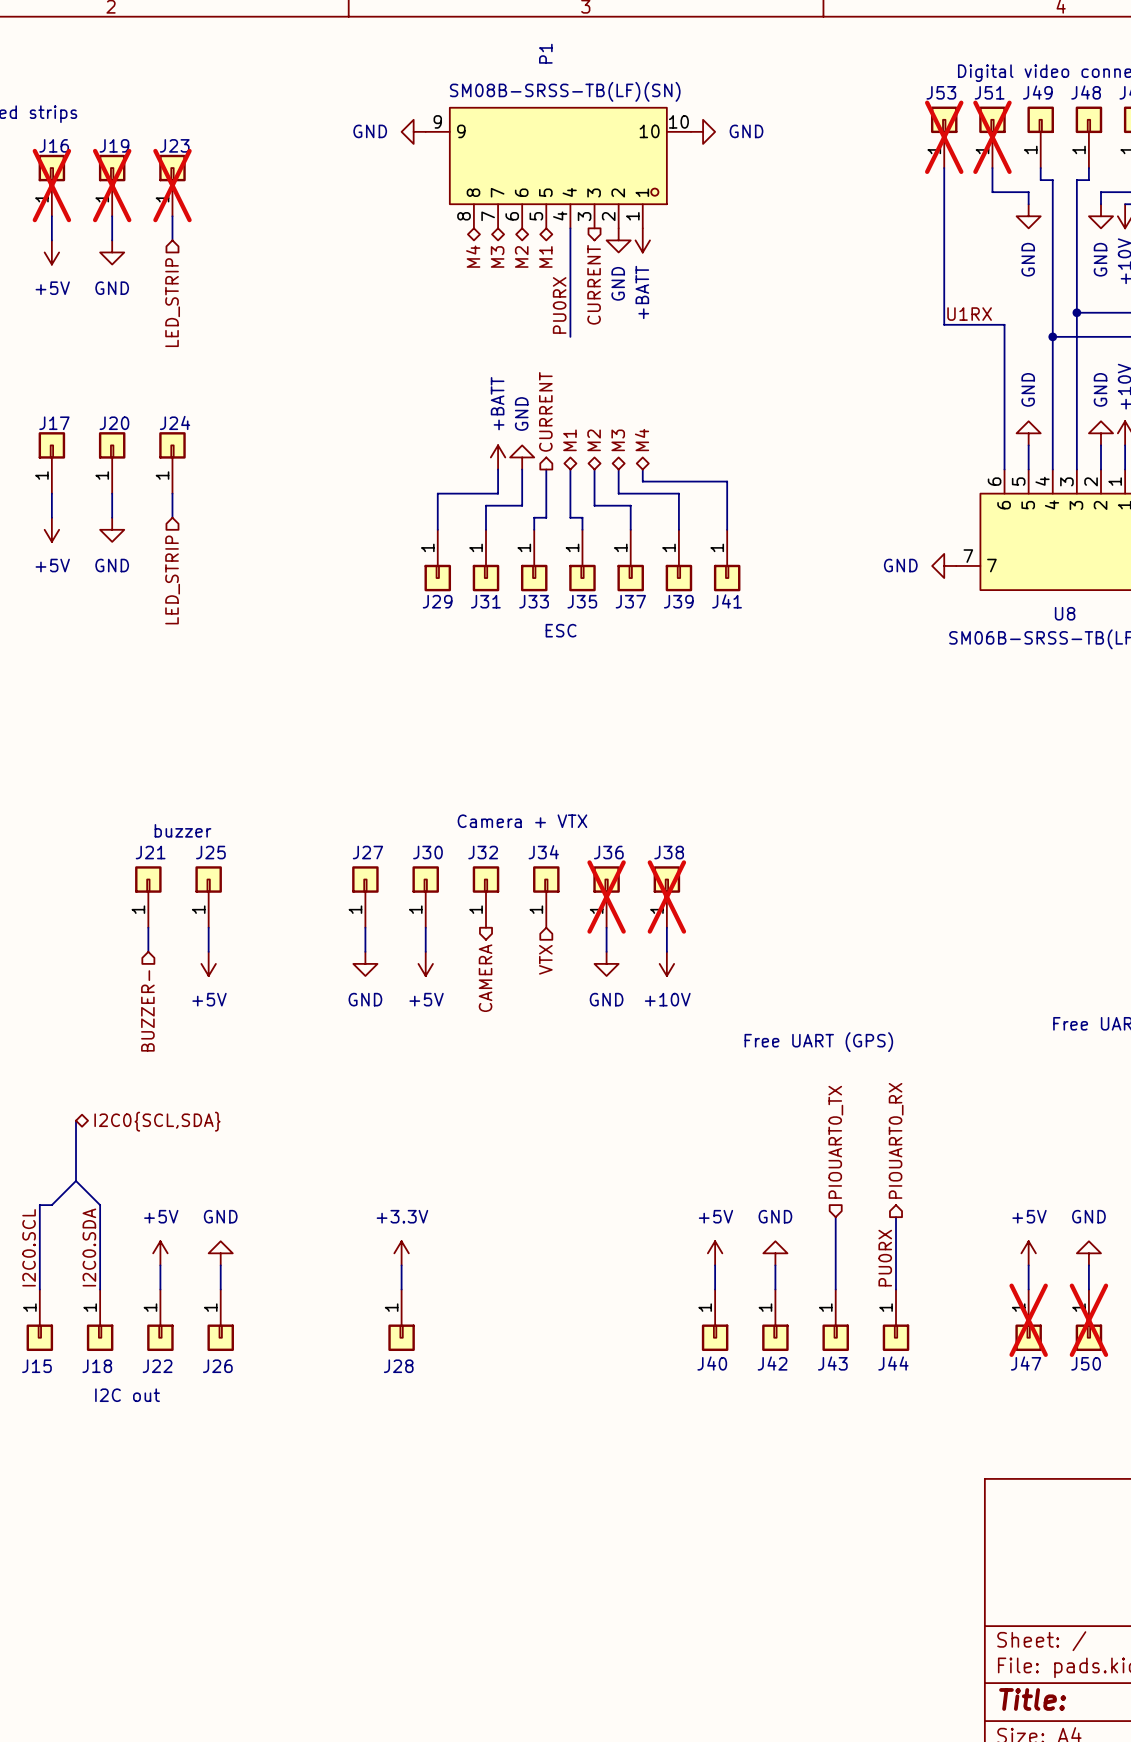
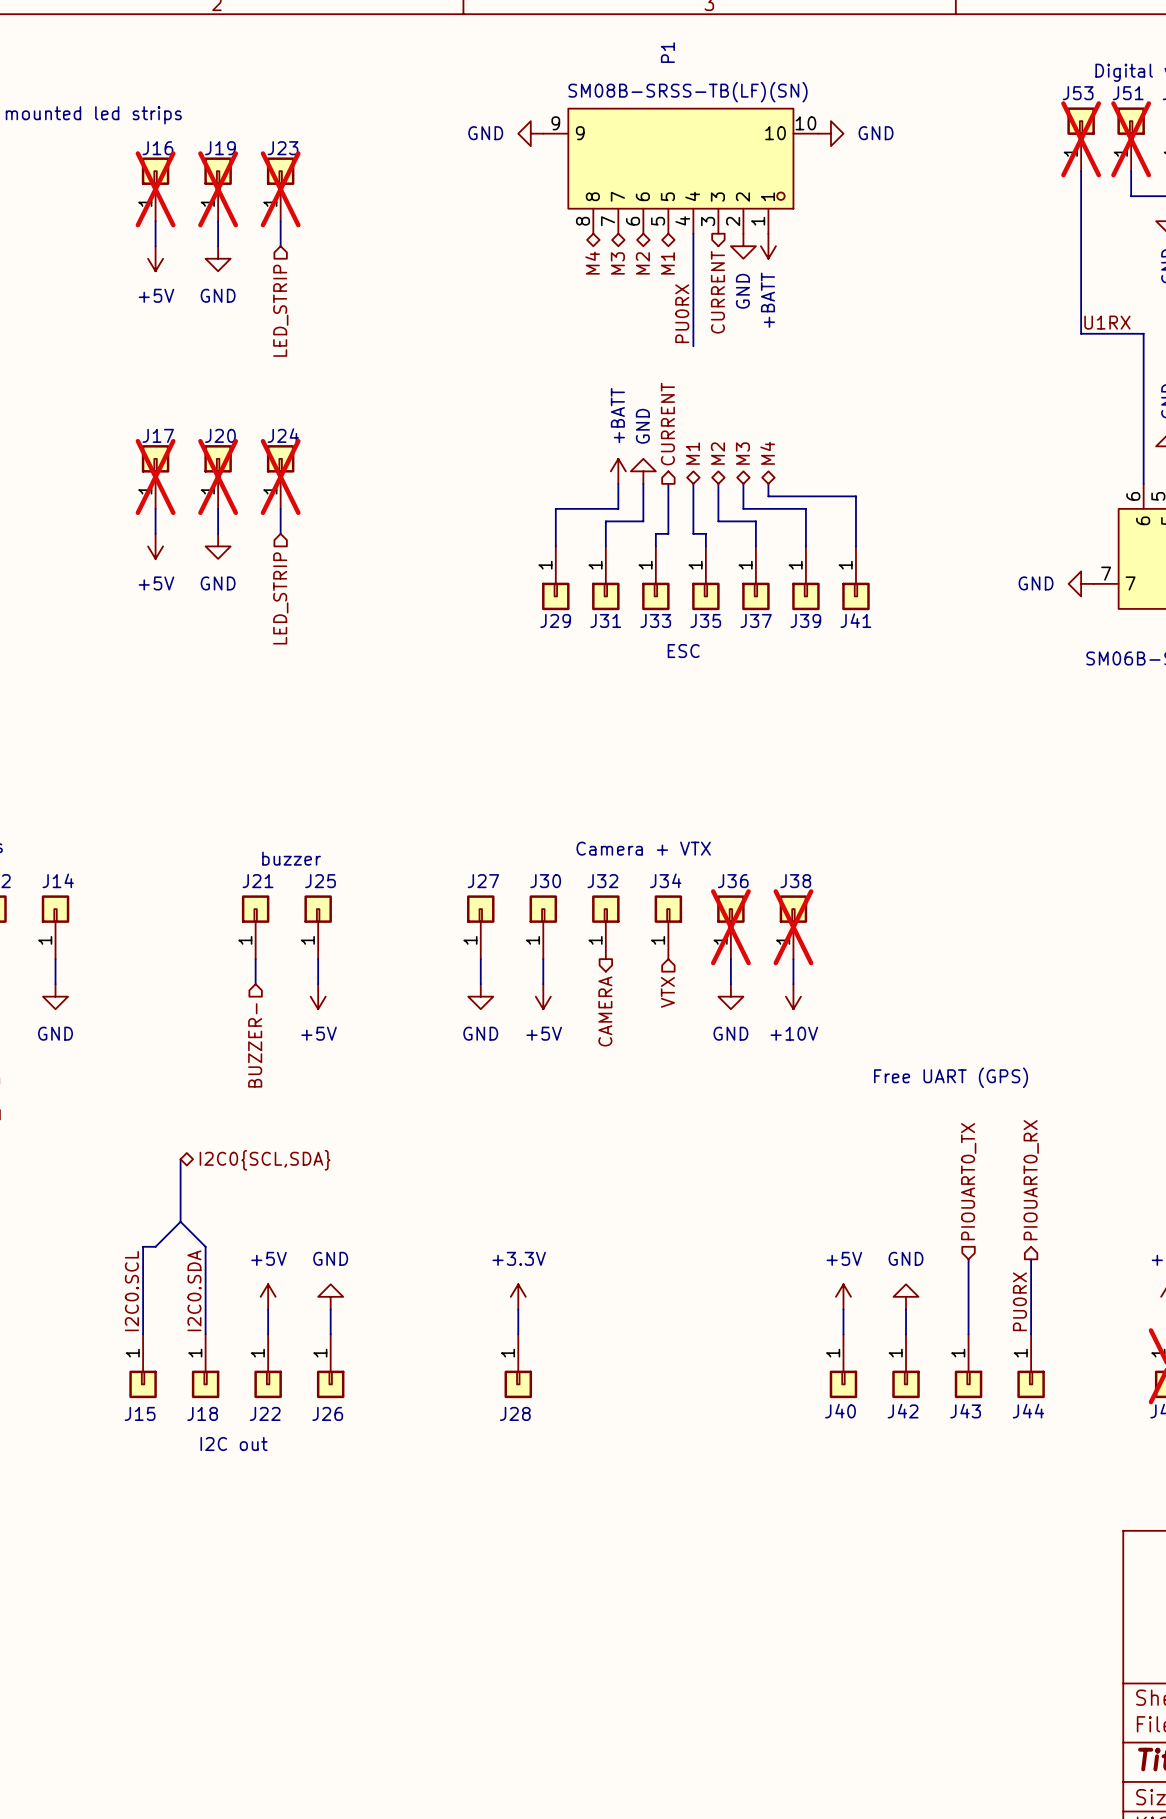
J17 do-not-place cross: none -> (155, 476)
J20 do-not-place cross: none -> (218, 476)
J24 do-not-place cross: none -> (280, 476)

